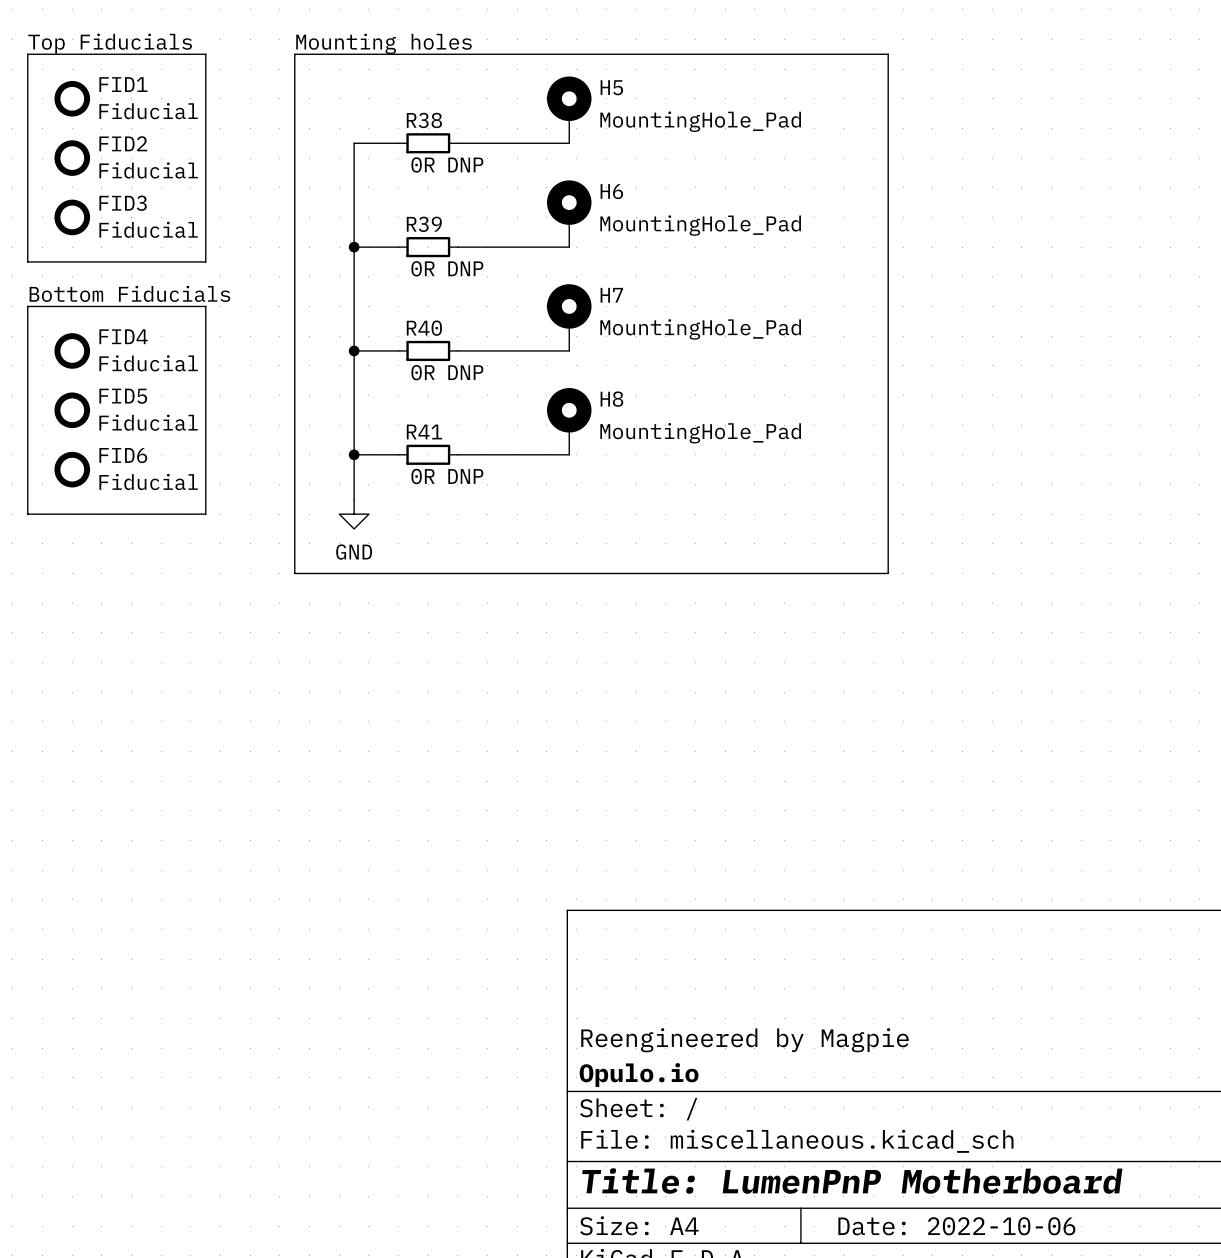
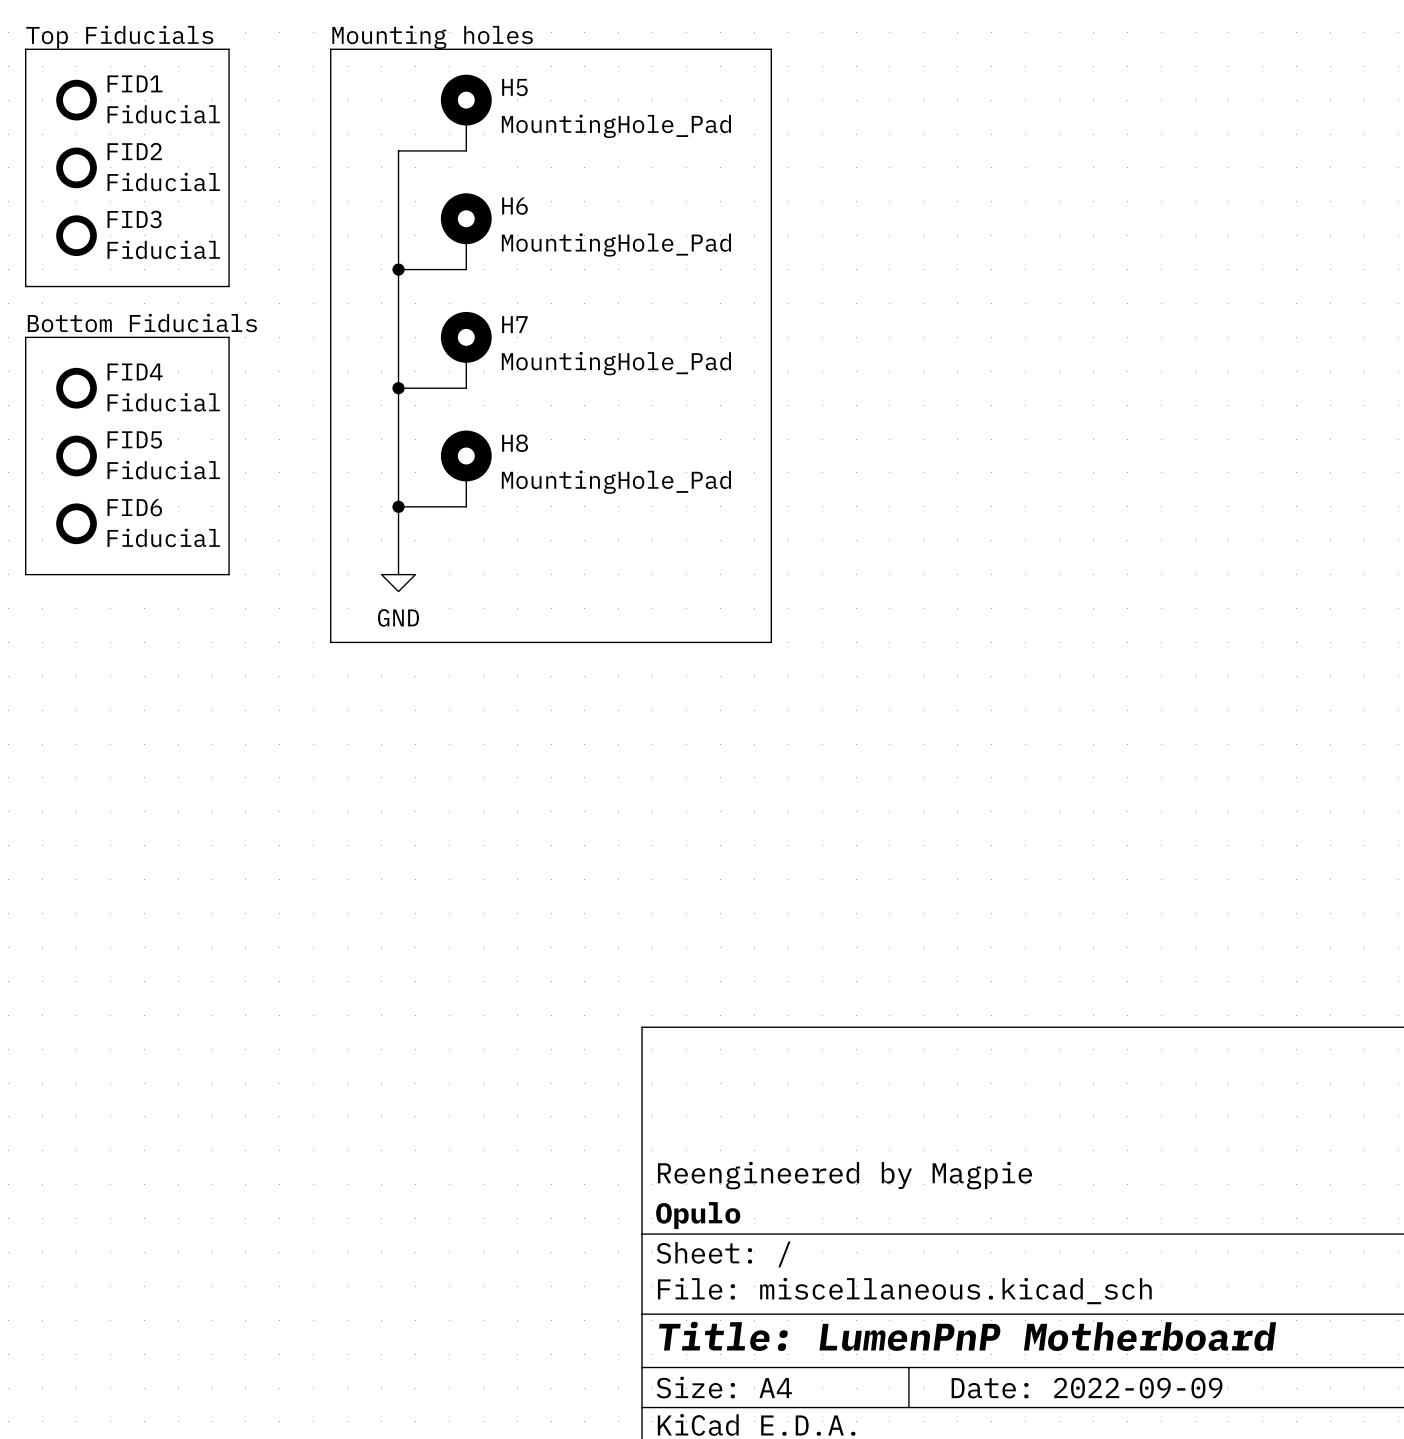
line: (680, 54) (888, 54) (888, 573) (680, 573) -> (771, 49) (771, 642)
H5 position: (569, 109) -> (466, 112)
R38: 0R (428, 143) -> none
wire: (457, 143) (569, 143) -> none
H6 position: (569, 213) -> (466, 231)
R39: 0R (428, 247) -> none
wire: (457, 247) (569, 247) -> none
H7 position: (569, 317) -> (466, 350)
R40: 0R (428, 350) -> none
wire: (457, 350) (569, 350) -> none
H8 position: (569, 421) -> (466, 468)
R41: 0R (428, 454) -> none
wire: (457, 454) (569, 454) -> none
title block: Opulo.io (639, 1075) -> Opulo (698, 1215)
title block: Date: 2022-10-06 (956, 1226) -> Date: 2022-09-09 (1087, 1388)

